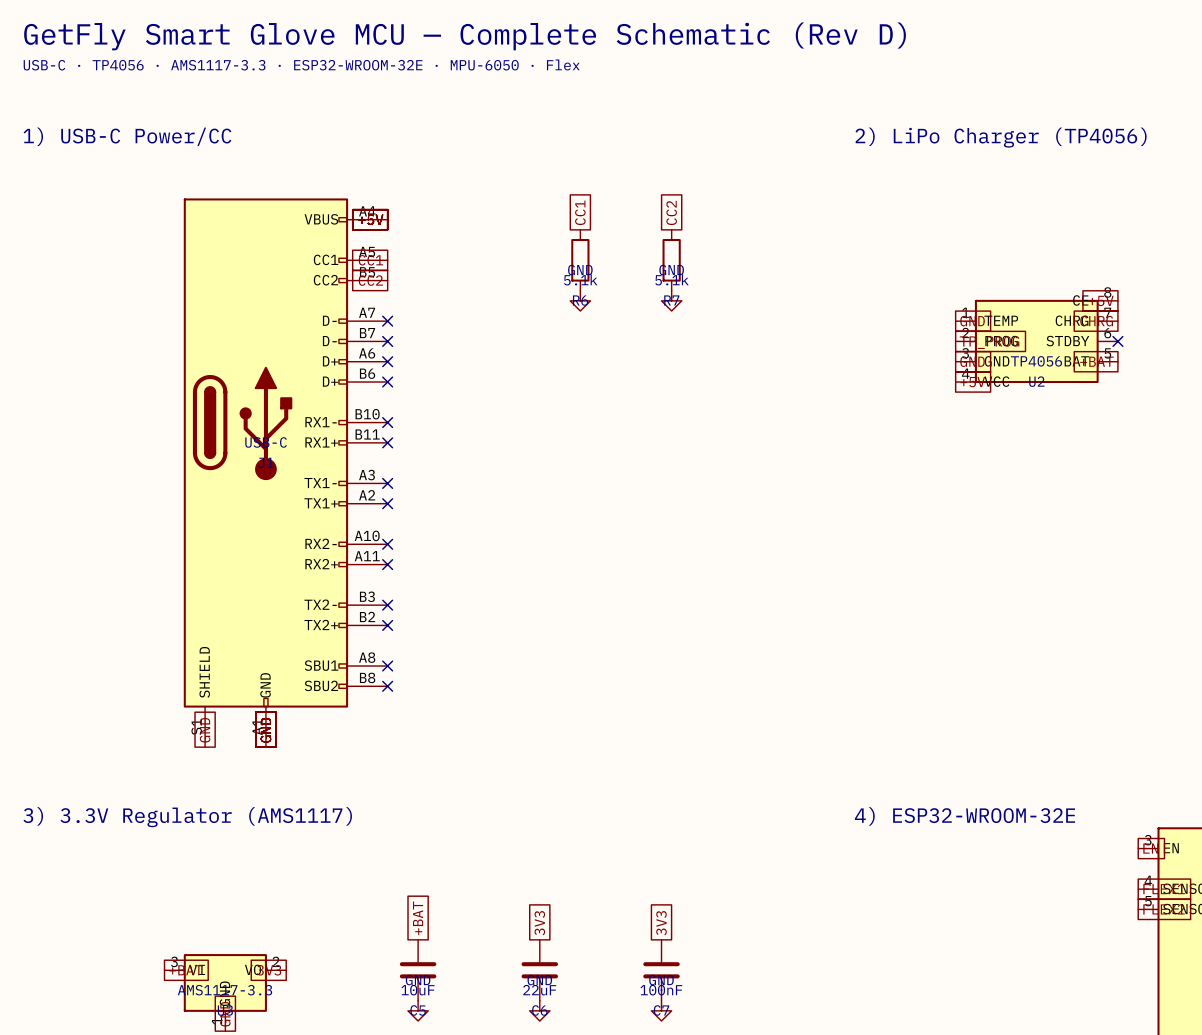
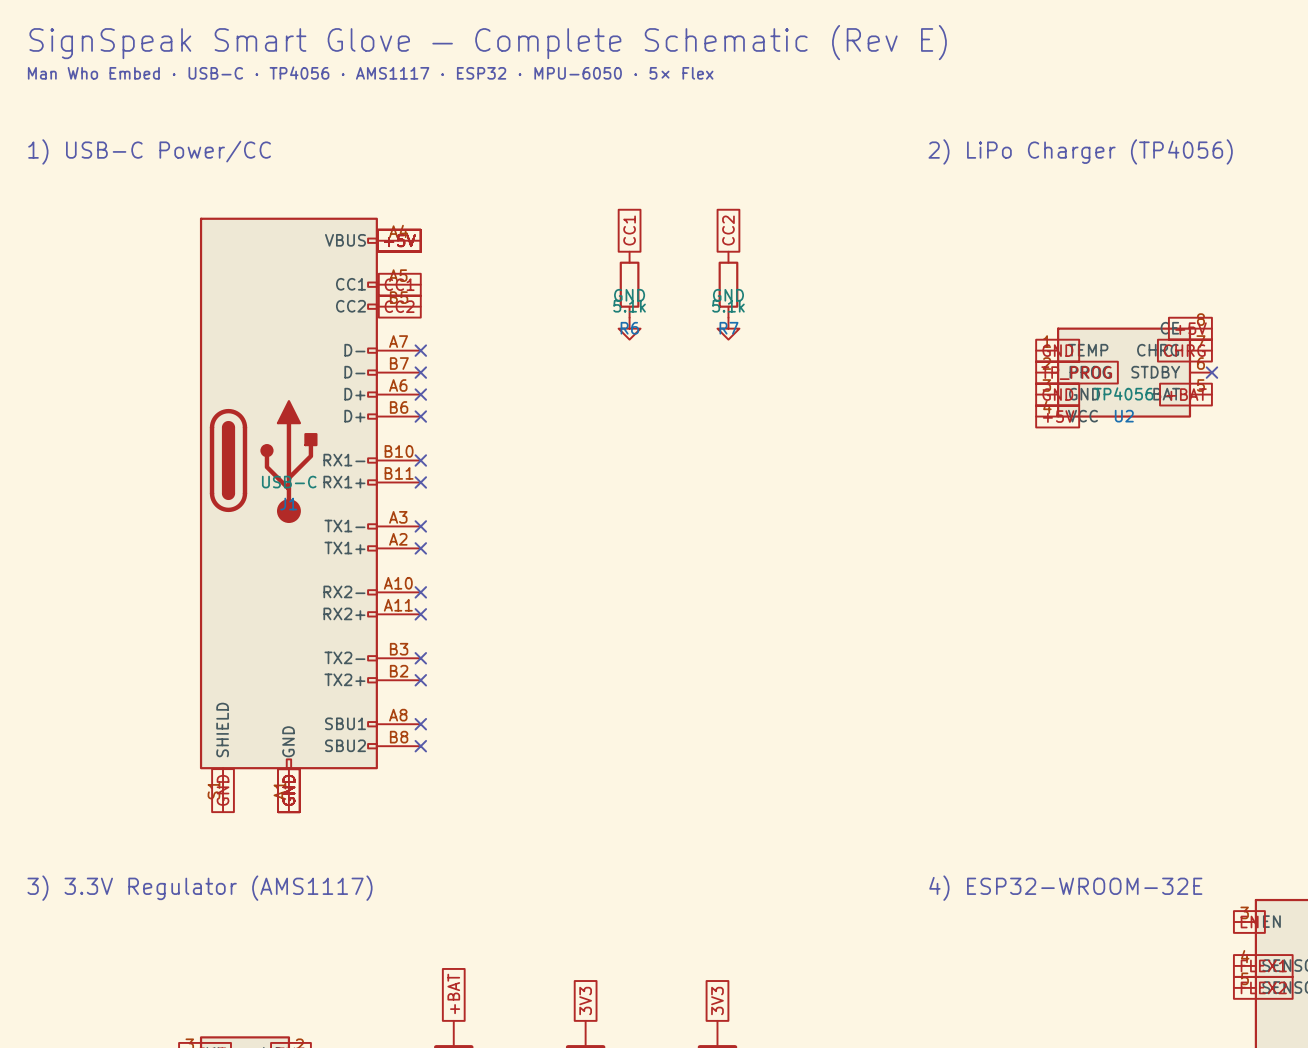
text: GetFly Smart Glove MCU — Complete Schematic (Rev D) (465, 36) -> SignSpeak Smart Glove — Complete Schematic (Rev E) (488, 42)
text: USB-C · TP4056 · AMS1117-3.3 · ESP32-WROOM-32E · MPU-6050 · Flex (301, 64) -> Man Who Embed · USB-C · TP4056 · AMS1117 · ESP32 · MPU-6050 · 5× Flex (370, 73)

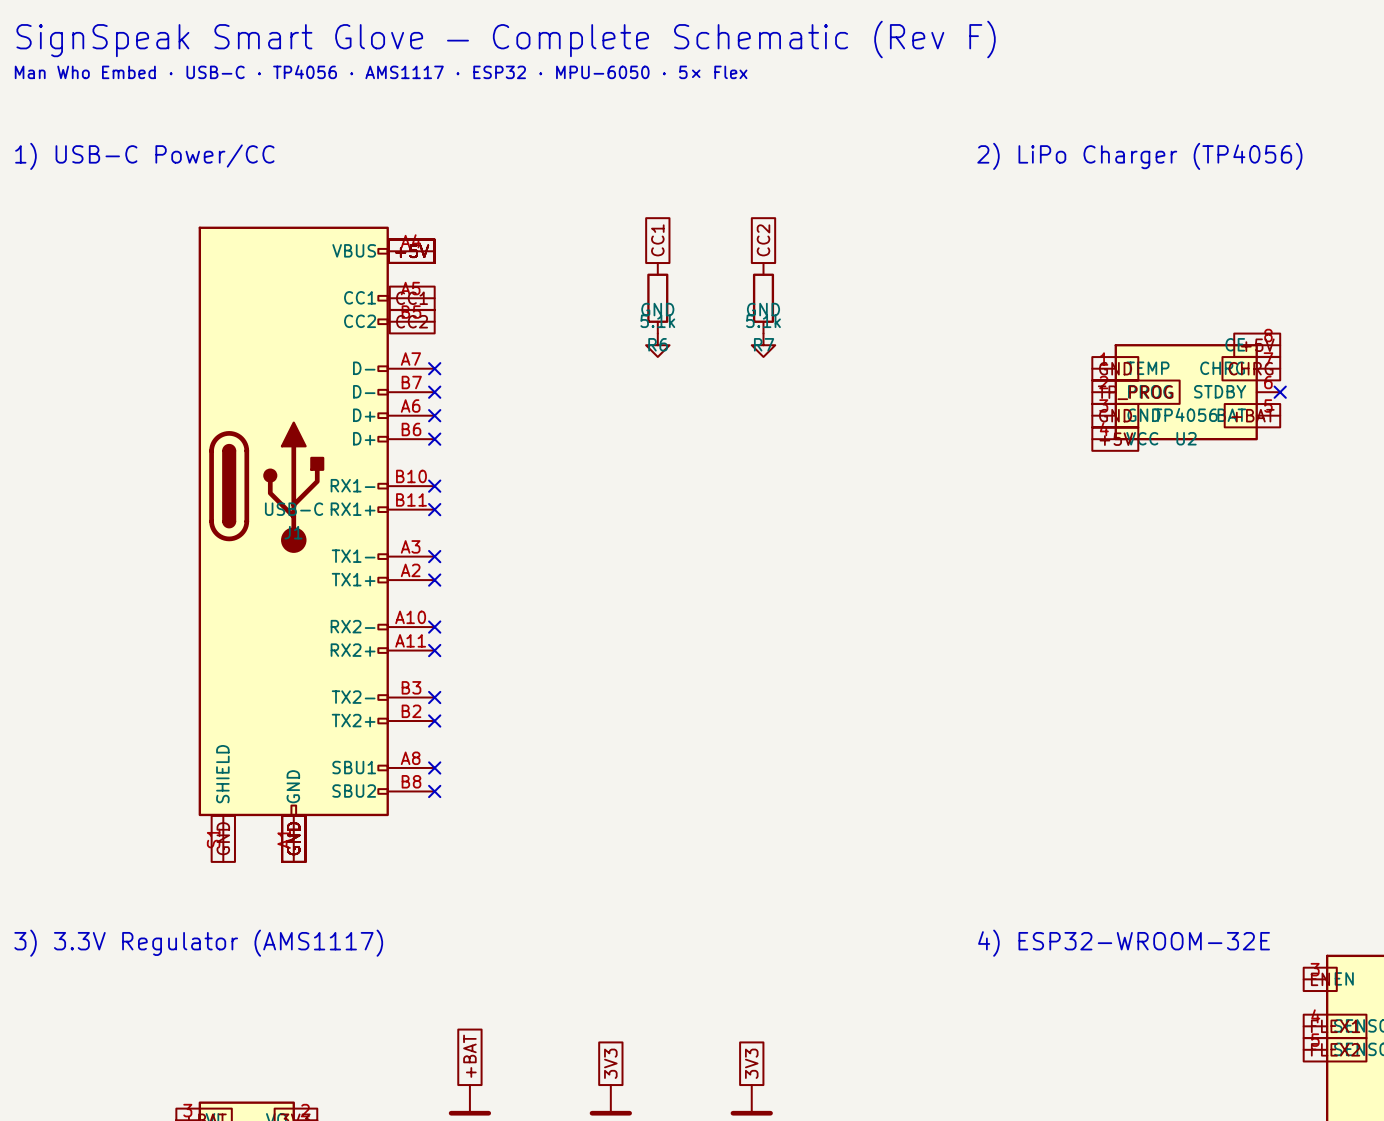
text: SignSpeak Smart Glove — Complete Schematic (Rev E) (488, 42) -> SignSpeak Smart Glove — Complete Schematic (Rev F) (506, 39)

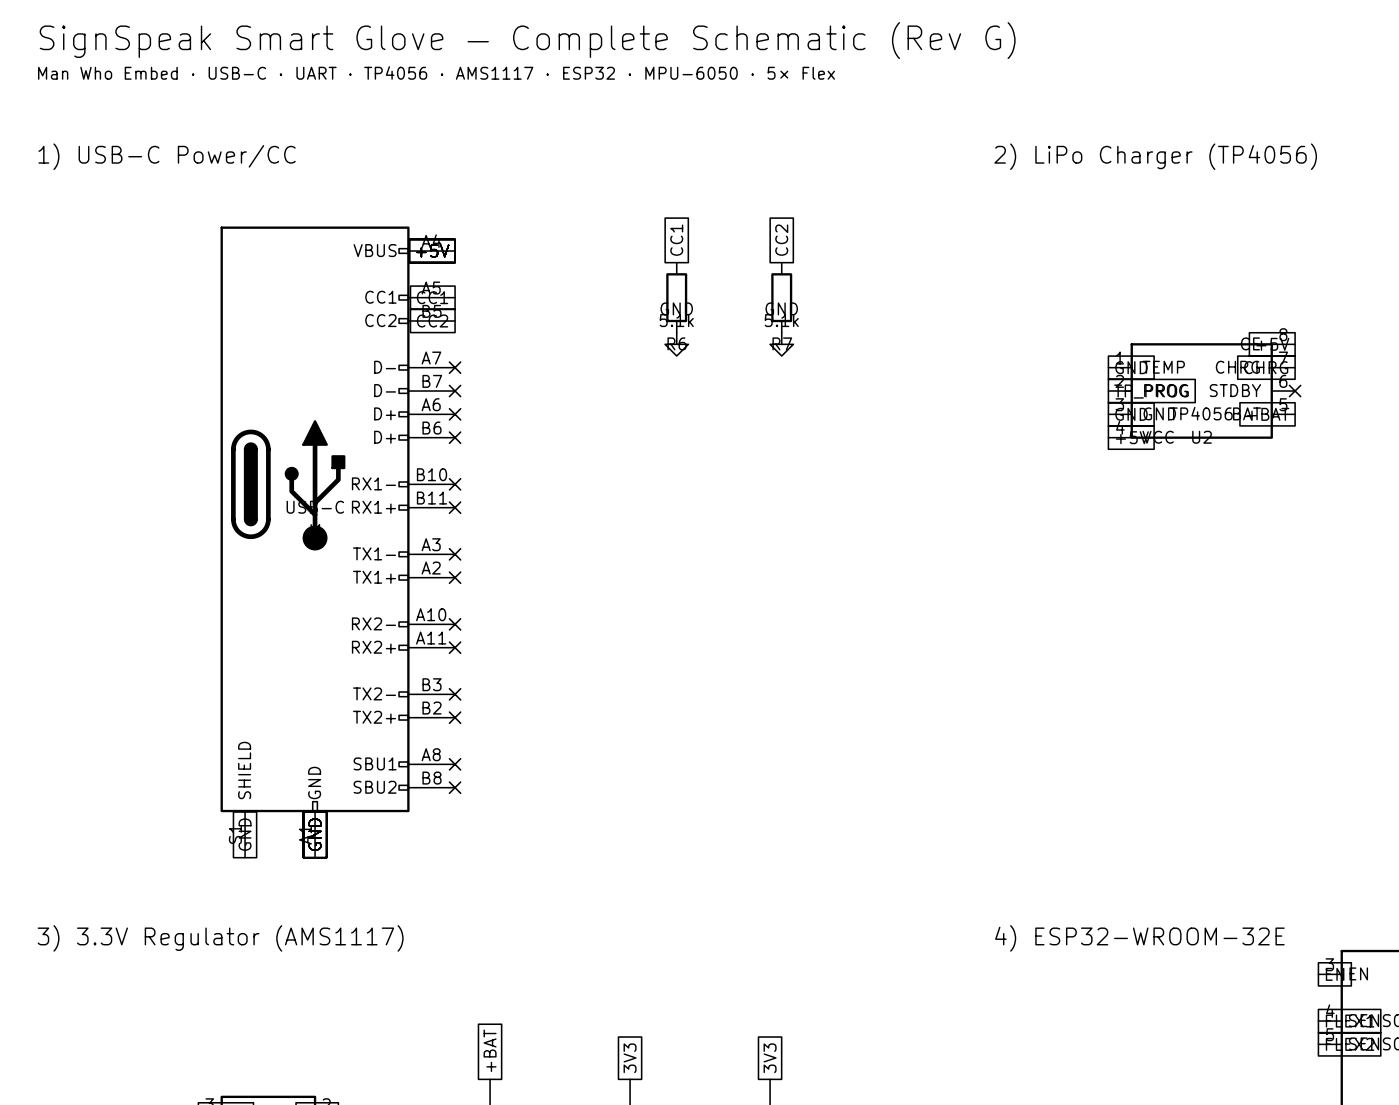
text: SignSpeak Smart Glove — Complete Schematic (Rev F) (506, 39) -> SignSpeak Smart Glove — Complete Schematic (Rev G) (527, 40)
text: Man Who Embed · USB-C · TP4056 · AMS1117 · ESP32 · MPU-6050 · 5× Flex (381, 72) -> Man Who Embed · USB-C · UART · TP4056 · AMS1117 · ESP32 · MPU-6050 · 5× Flex (436, 72)

